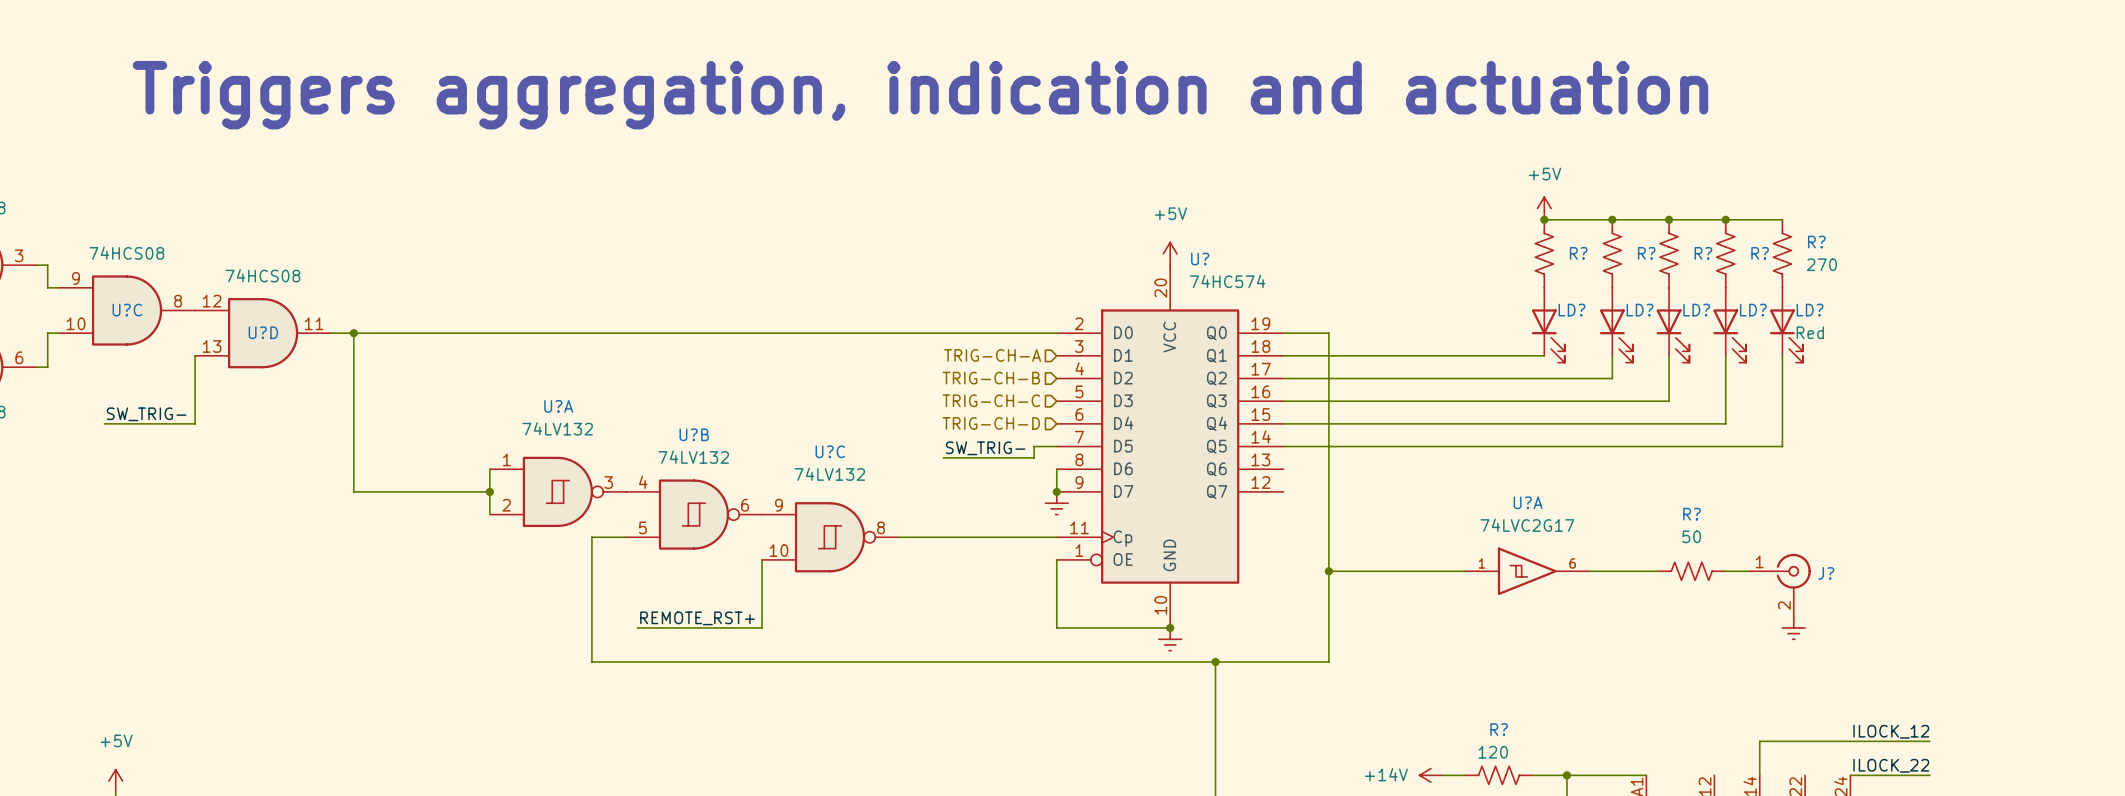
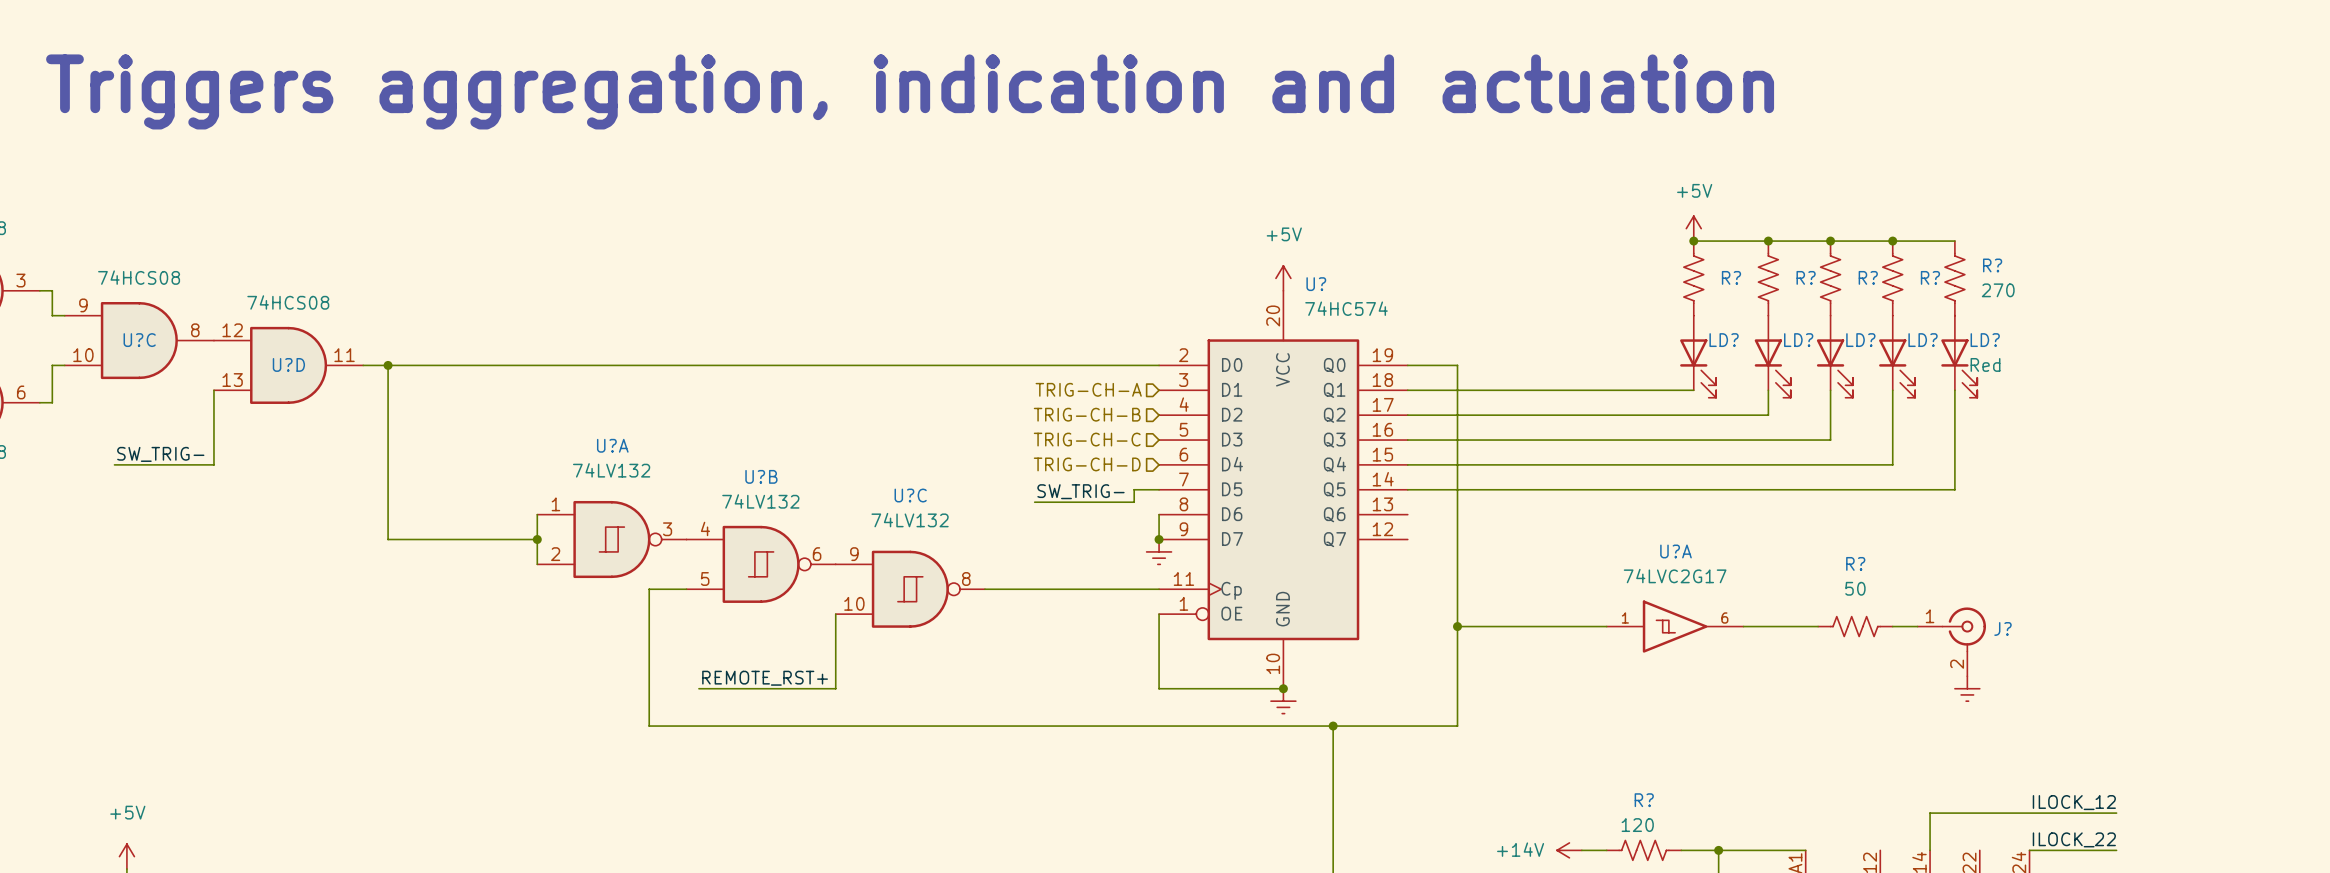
text position: Triggers aggregation, indication and actuation (920, 95) -> Triggers aggregation, indication and actuation (910, 91)

